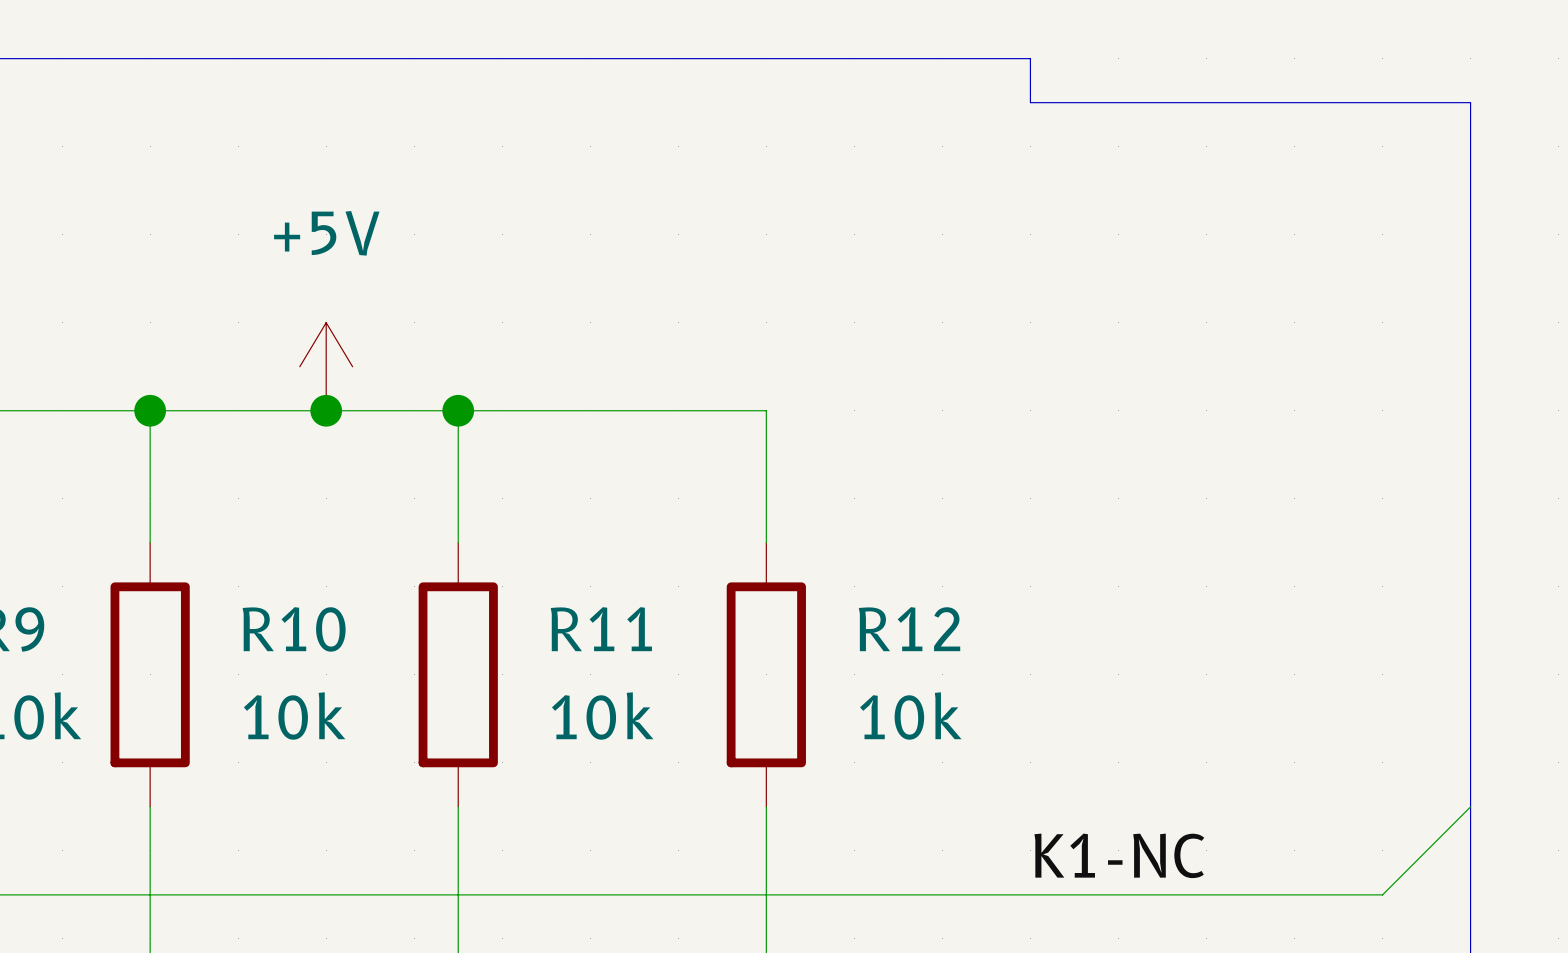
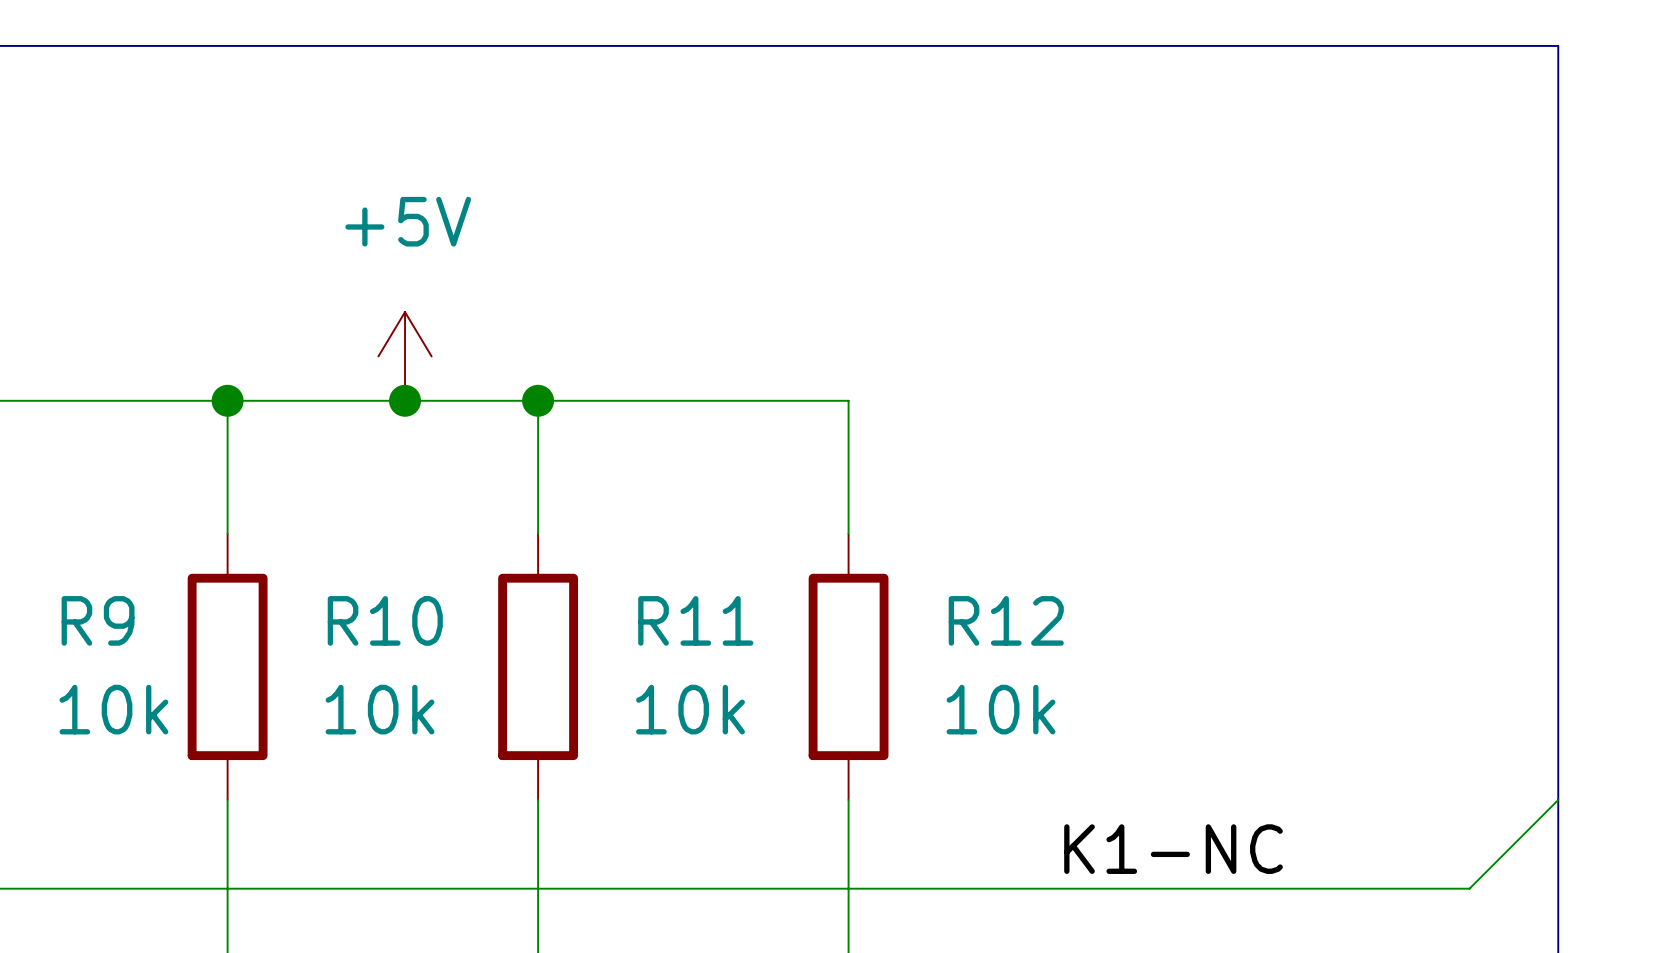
bus: (1030, 58) (1030, 102) (1470, 102) -> (1114, 45) (1558, 45) (1558, 90)

